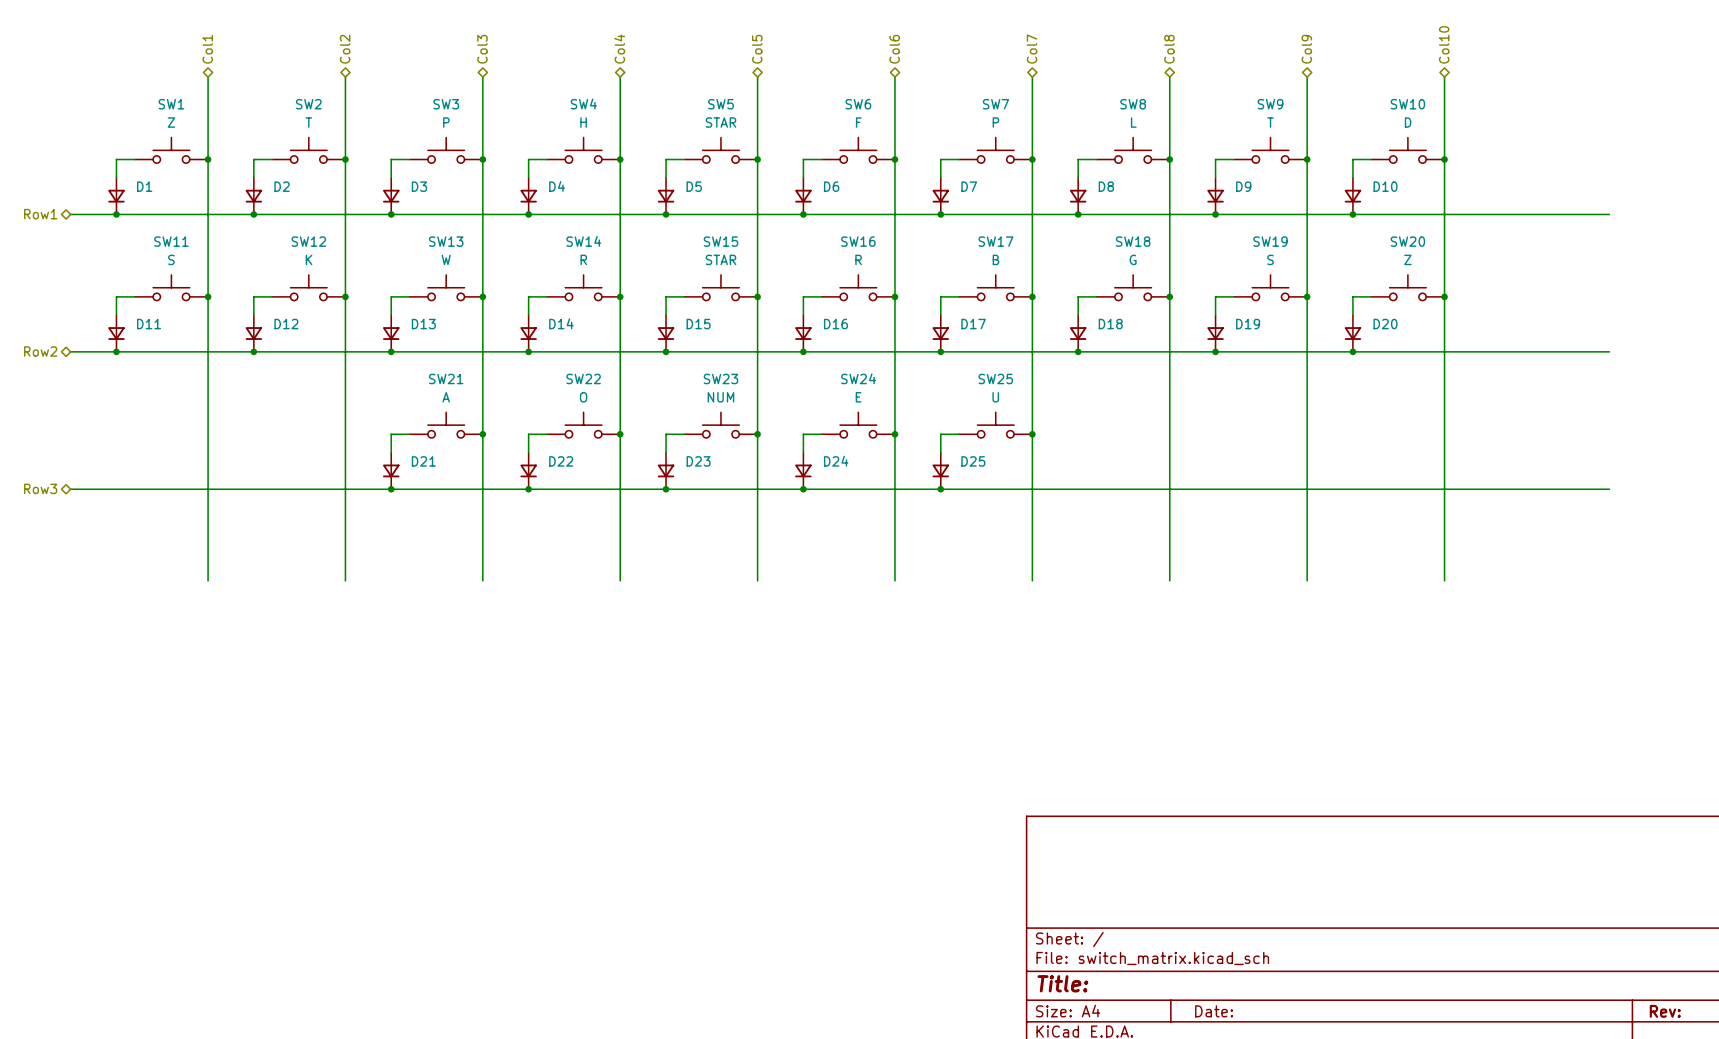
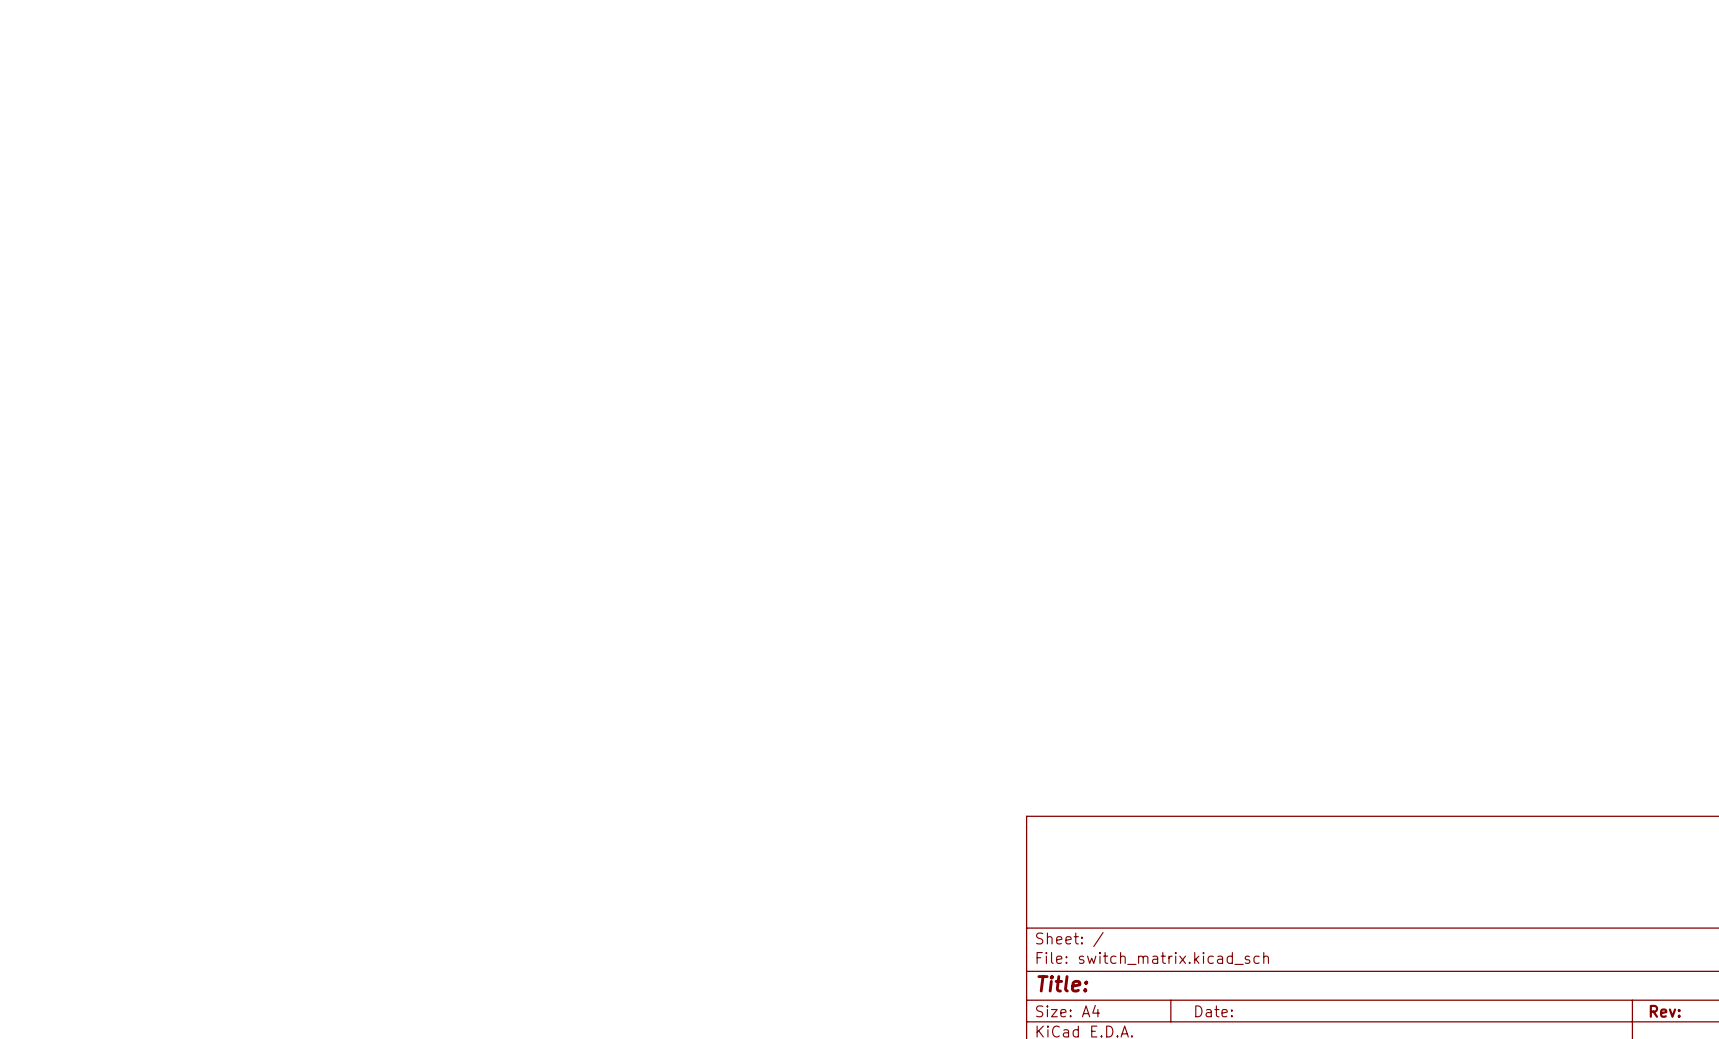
hierarchical label: Col10 (1444, 44) -> none
hierarchical label: Col1 (207, 49) -> none
hierarchical label: Col2 (345, 49) -> none
hierarchical label: Col3 (482, 49) -> none
hierarchical label: Col4 (619, 49) -> none
hierarchical label: Col5 (757, 49) -> none
hierarchical label: Col6 (894, 49) -> none
hierarchical label: Col7 (1032, 49) -> none
hierarchical label: Col8 (1169, 49) -> none
hierarchical label: Col9 (1306, 49) -> none
wire: (208, 77) (208, 580) -> none
wire: (345, 77) (345, 580) -> none
wire: (482, 77) (482, 580) -> none
wire: (620, 77) (620, 580) -> none
wire: (757, 77) (757, 580) -> none
wire: (894, 77) (894, 580) -> none
wire: (1032, 77) (1032, 580) -> none
wire: (1169, 77) (1169, 580) -> none
wire: (1307, 77) (1307, 580) -> none
wire: (1444, 77) (1444, 580) -> none
SW1: Z (171, 150) -> none
SW2: T (308, 150) -> none
SW3: P (446, 150) -> none
SW4: H (583, 150) -> none
SW5: STAR (720, 150) -> none
SW6: F (858, 150) -> none
SW7: P (995, 150) -> none
SW8: L (1133, 150) -> none
SW9: T (1270, 150) -> none
SW10: D (1407, 150) -> none
wire: (134, 159) (116, 159) (116, 177) -> none
junction: (208, 159) -> none
wire: (272, 159) (253, 159) (253, 177) -> none
junction: (345, 159) -> none
wire: (409, 159) (391, 159) (391, 177) -> none
junction: (482, 159) -> none
wire: (546, 159) (528, 159) (528, 177) -> none
junction: (620, 159) -> none
wire: (684, 159) (666, 159) (666, 177) -> none
junction: (757, 159) -> none
wire: (821, 159) (803, 159) (803, 177) -> none
junction: (894, 159) -> none
wire: (959, 159) (940, 159) (940, 177) -> none
junction: (1032, 159) -> none
wire: (1096, 159) (1078, 159) (1078, 177) -> none
junction: (1169, 159) -> none
wire: (1233, 159) (1215, 159) (1215, 177) -> none
junction: (1307, 159) -> none
wire: (1371, 159) (1352, 159) (1352, 177) -> none
junction: (1444, 159) -> none
D1: (116, 196) -> none
D2: (253, 196) -> none
D3: (391, 196) -> none
D4: (528, 196) -> none
D5: (666, 196) -> none
D6: (803, 196) -> none
D7: (940, 196) -> none
D8: (1078, 196) -> none
D9: (1215, 196) -> none
D10: (1352, 196) -> none
hierarchical label: Row1 (40, 214) -> none
wire: (70, 214) (1609, 214) -> none
junction: (116, 214) -> none
junction: (253, 214) -> none
junction: (391, 214) -> none
junction: (528, 214) -> none
junction: (666, 214) -> none
junction: (803, 214) -> none
junction: (940, 214) -> none
junction: (1078, 214) -> none
junction: (1215, 214) -> none
junction: (1352, 214) -> none
SW11: S (171, 287) -> none
SW12: K (308, 287) -> none
SW13: W (446, 287) -> none
SW14: R (583, 287) -> none
SW15: STAR (720, 287) -> none
SW16: R (858, 287) -> none
SW17: B (995, 287) -> none
SW18: G (1133, 287) -> none
SW19: S (1270, 287) -> none
SW20: Z (1407, 287) -> none
wire: (134, 296) (116, 296) (116, 315) -> none
junction: (208, 296) -> none
wire: (272, 296) (253, 296) (253, 315) -> none
junction: (345, 296) -> none
wire: (409, 296) (391, 296) (391, 315) -> none
junction: (482, 296) -> none
wire: (546, 296) (528, 296) (528, 315) -> none
junction: (620, 296) -> none
wire: (684, 296) (666, 296) (666, 315) -> none
junction: (757, 296) -> none
wire: (821, 296) (803, 296) (803, 315) -> none
junction: (894, 296) -> none
wire: (959, 296) (940, 296) (940, 315) -> none
junction: (1032, 296) -> none
wire: (1096, 296) (1078, 296) (1078, 315) -> none
junction: (1169, 296) -> none
wire: (1233, 296) (1215, 296) (1215, 315) -> none
junction: (1307, 296) -> none
wire: (1371, 296) (1352, 296) (1352, 315) -> none
junction: (1444, 296) -> none
D11: (116, 333) -> none
D12: (253, 333) -> none
D13: (391, 333) -> none
D14: (528, 333) -> none
D15: (666, 333) -> none
D16: (803, 333) -> none
D17: (940, 333) -> none
D18: (1078, 333) -> none
D19: (1215, 333) -> none
D20: (1352, 333) -> none
hierarchical label: Row2 (40, 351) -> none
wire: (70, 351) (1609, 351) -> none
junction: (116, 351) -> none
junction: (253, 351) -> none
junction: (391, 351) -> none
junction: (528, 351) -> none
junction: (666, 351) -> none
junction: (803, 351) -> none
junction: (940, 351) -> none
junction: (1078, 351) -> none
junction: (1215, 351) -> none
junction: (1352, 351) -> none
SW21: A (446, 425) -> none
SW22: O (583, 425) -> none
SW23: NUM (720, 425) -> none
SW24: E (858, 425) -> none
SW25: U (995, 425) -> none
wire: (409, 434) (391, 434) (391, 452) -> none
junction: (482, 434) -> none
wire: (546, 434) (528, 434) (528, 452) -> none
junction: (620, 434) -> none
wire: (684, 434) (666, 434) (666, 452) -> none
junction: (757, 434) -> none
wire: (821, 434) (803, 434) (803, 452) -> none
junction: (894, 434) -> none
wire: (959, 434) (940, 434) (940, 452) -> none
junction: (1032, 434) -> none
D21: (391, 470) -> none
D22: (528, 470) -> none
D23: (666, 470) -> none
D24: (803, 470) -> none
D25: (940, 470) -> none
hierarchical label: Row3 (40, 488) -> none
wire: (70, 489) (1609, 489) -> none
junction: (391, 489) -> none
junction: (528, 489) -> none
junction: (666, 489) -> none
junction: (803, 489) -> none
junction: (940, 489) -> none

